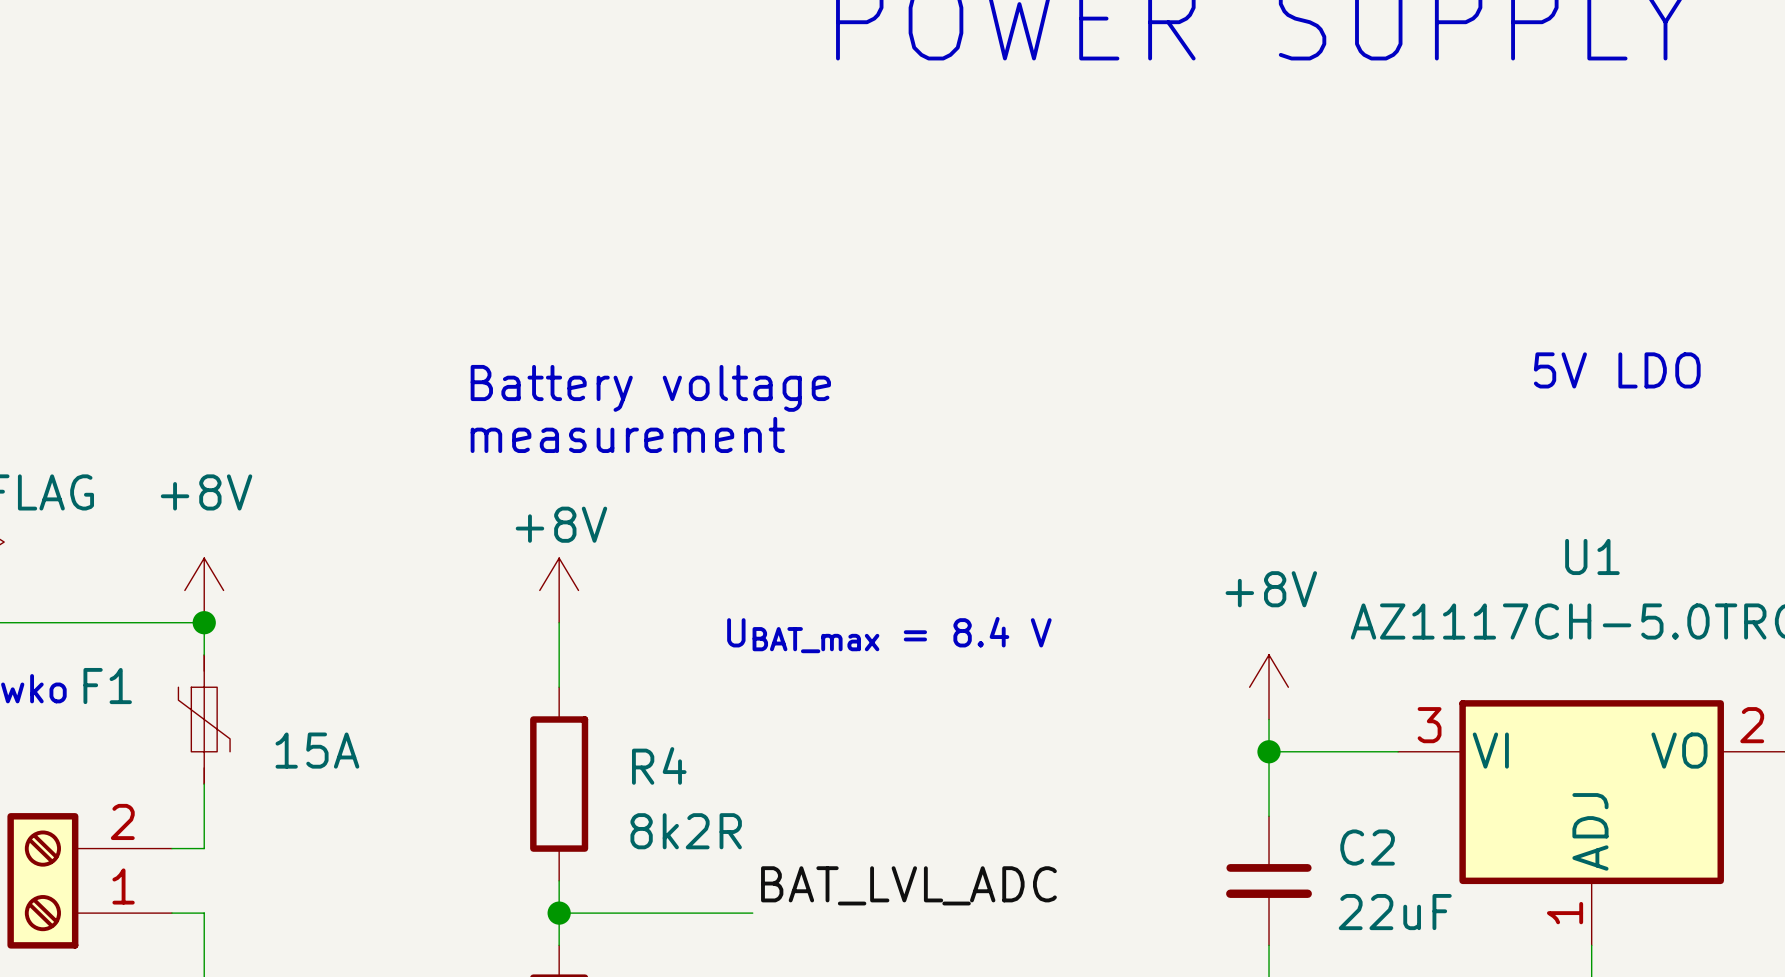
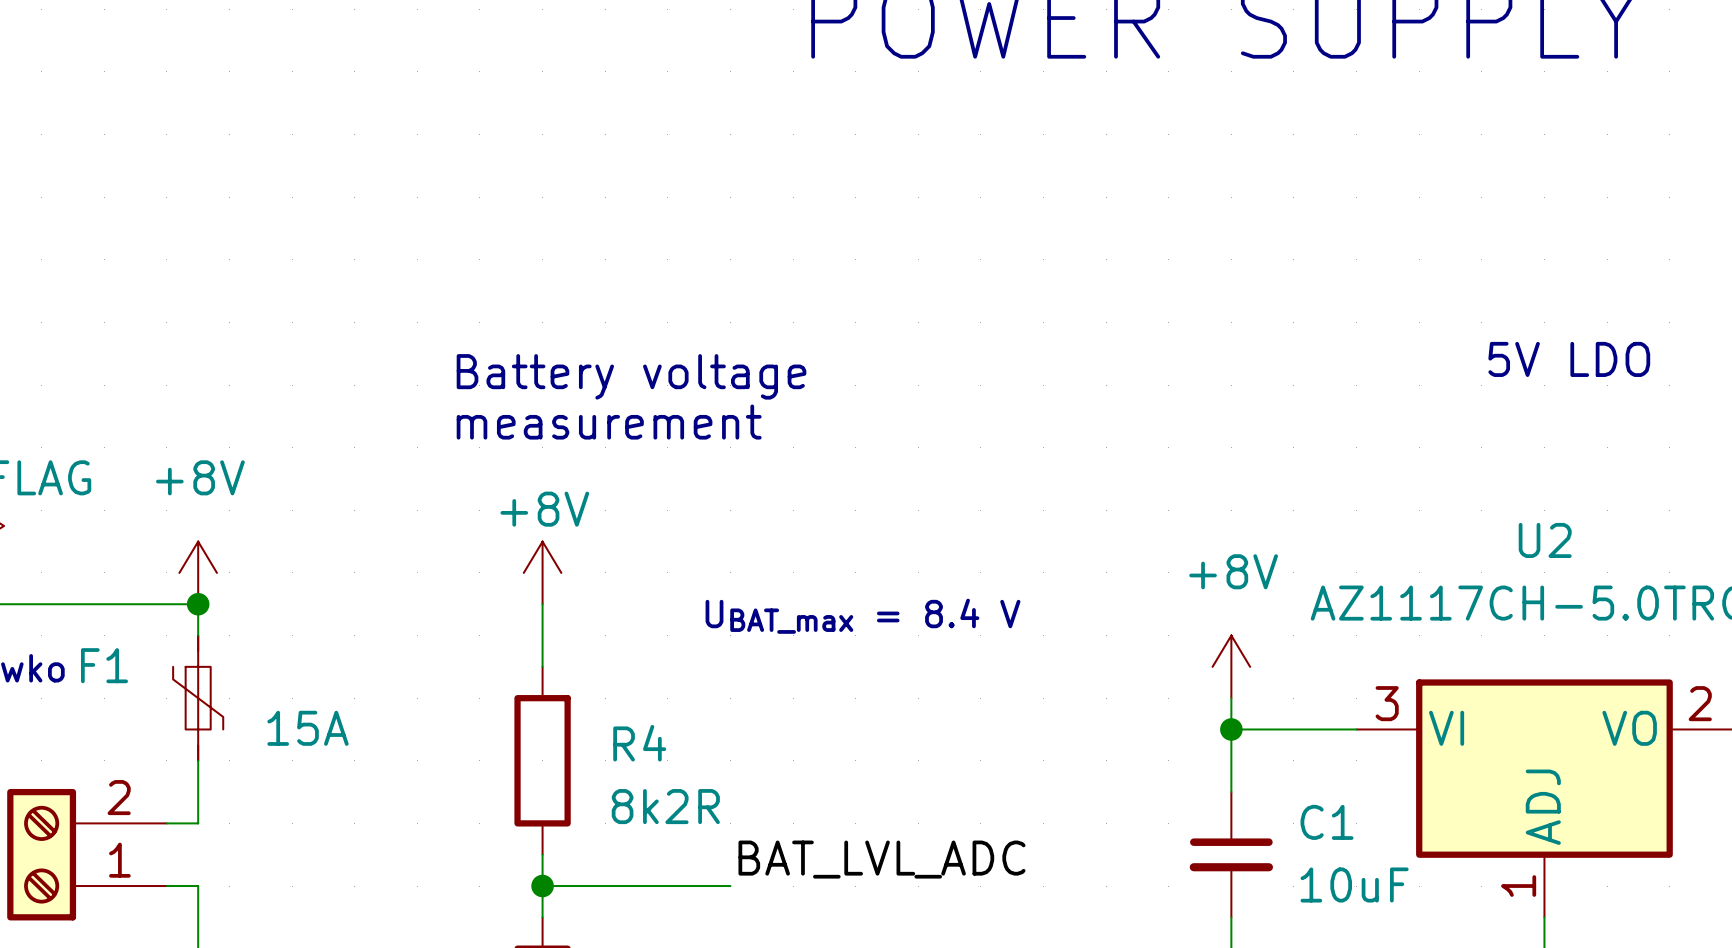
U1 name: U1 (1592, 556) -> U2 (1545, 540)
C2 name: C2 (1367, 847) -> C1 (1327, 822)
C2 value: 22uF (1395, 912) -> 10uF (1354, 885)

